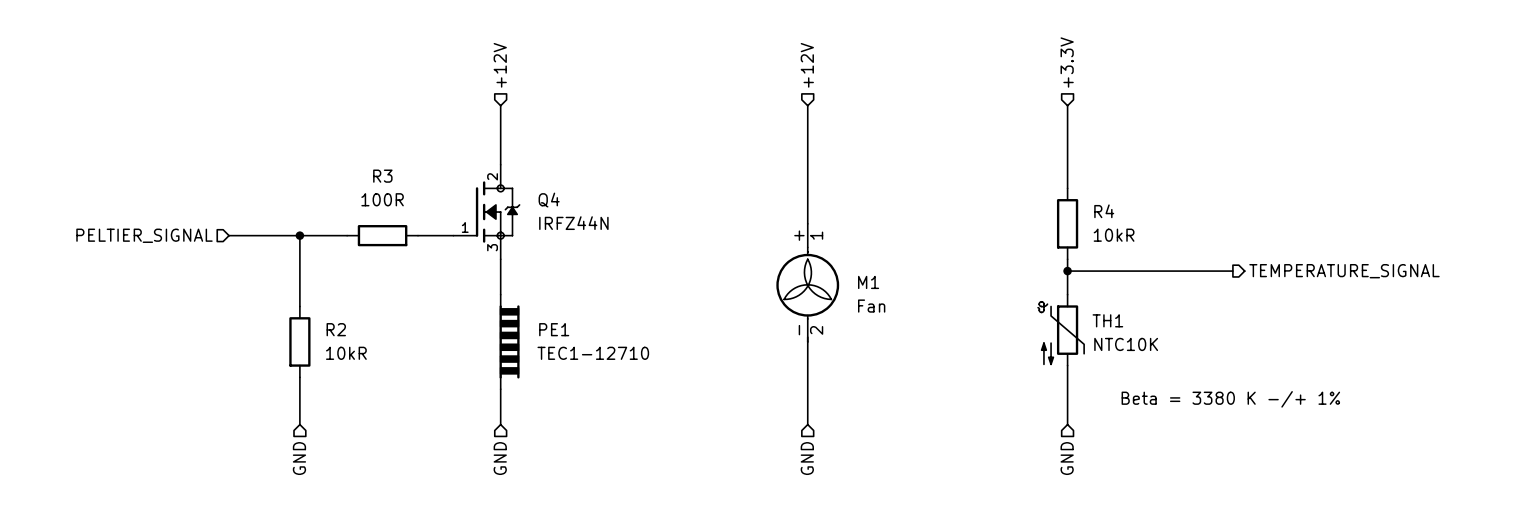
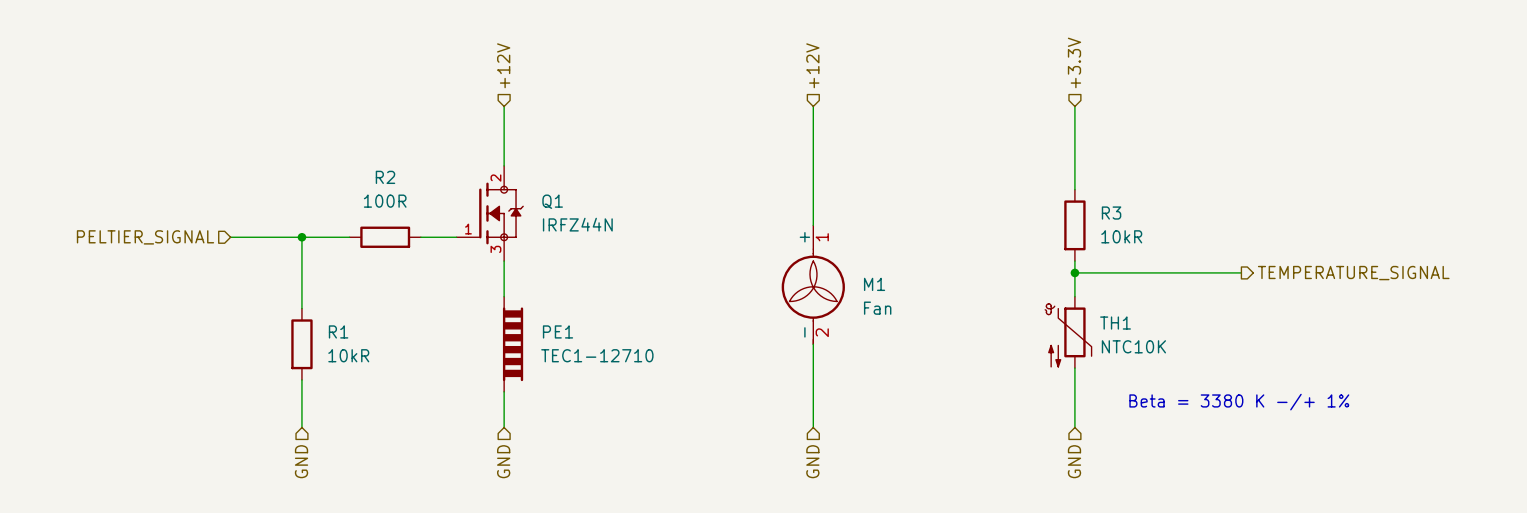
R3 name: R3 (382, 176) -> R2 (385, 177)
Q4 name: Q4 (549, 200) -> Q1 (552, 201)
R4 name: R4 (1104, 211) -> R3 (1111, 213)
R2 name: R2 (336, 329) -> R1 (338, 331)

